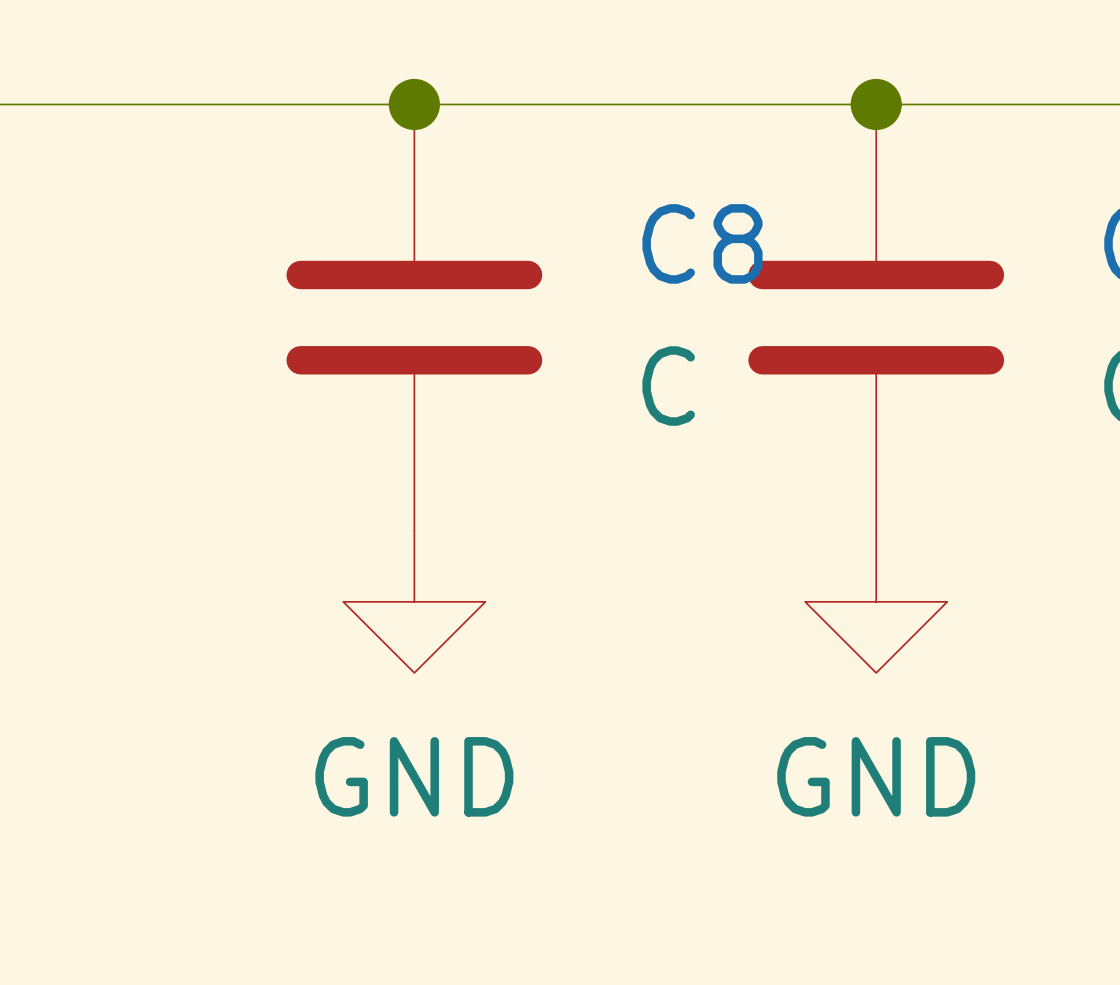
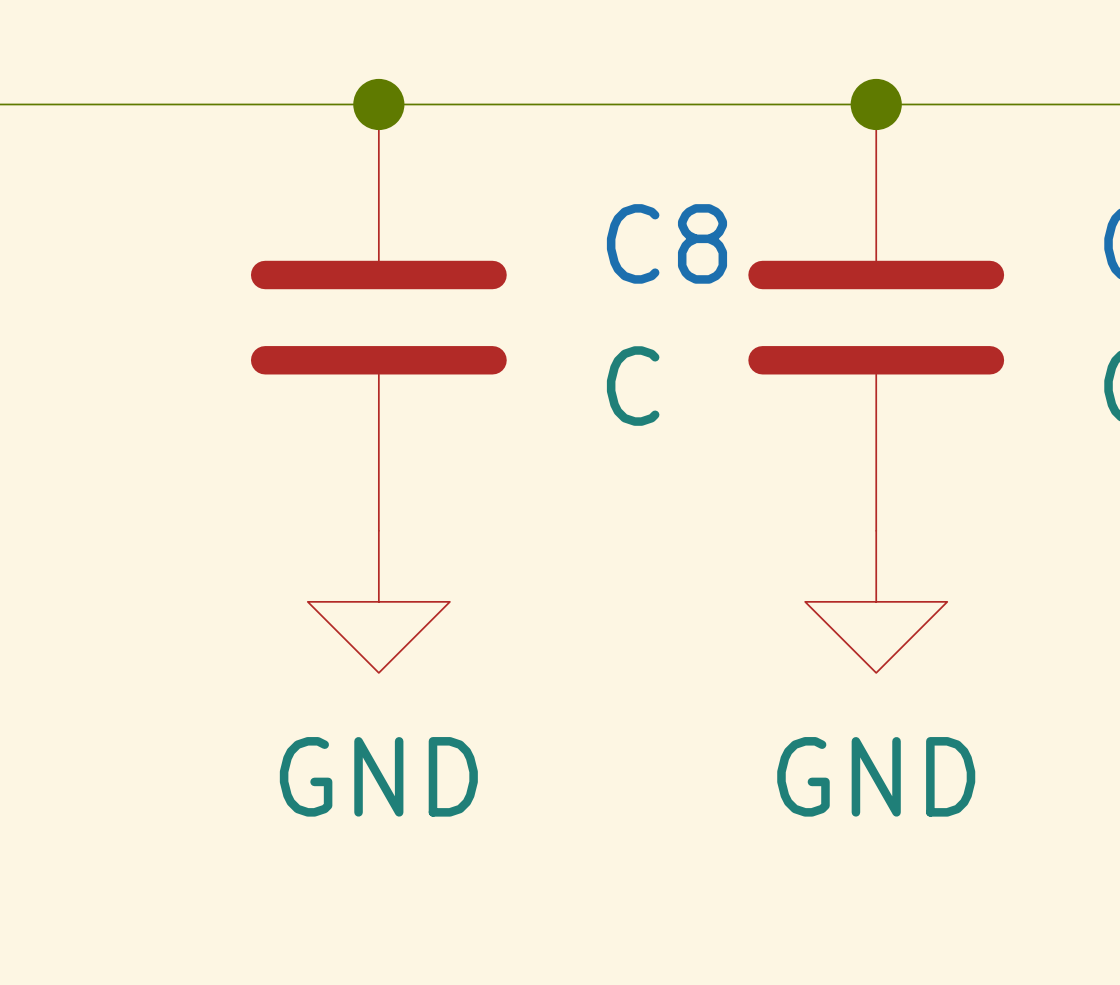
junction position: (414, 104) -> (378, 104)
C8 position: (414, 317) -> (378, 317)
power symbol position: GND (414, 601) -> GND (378, 601)

